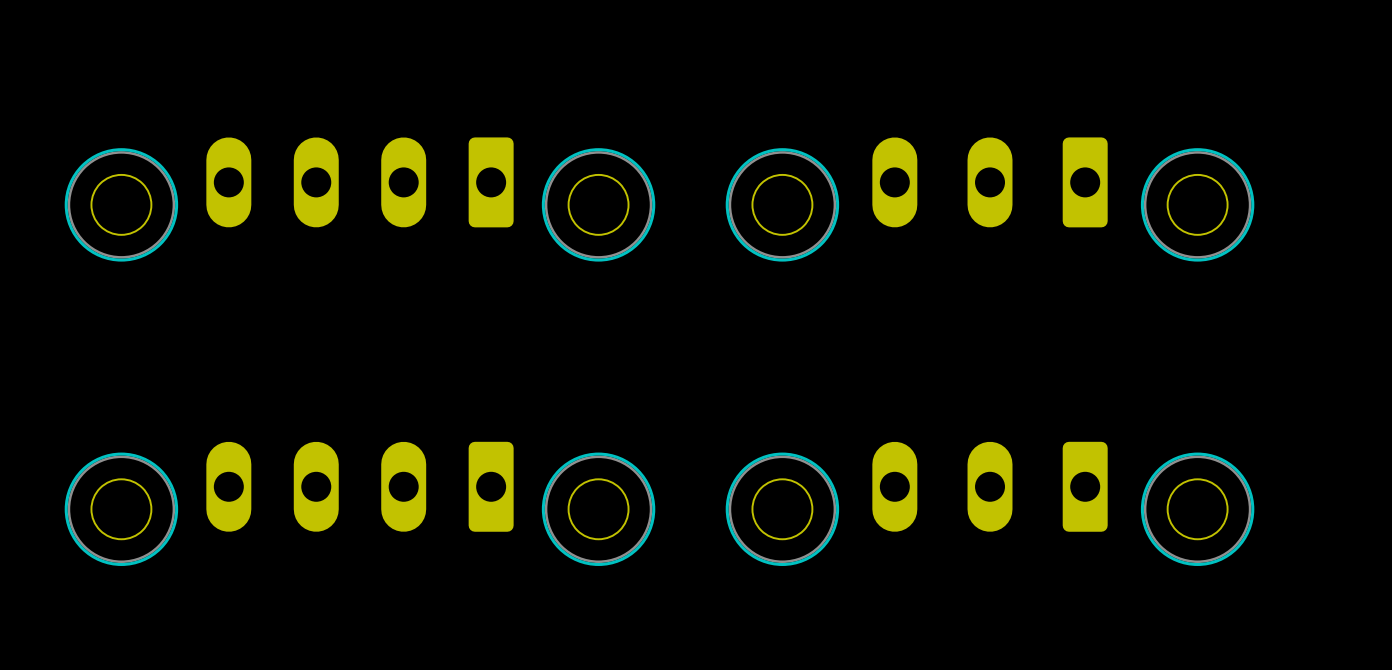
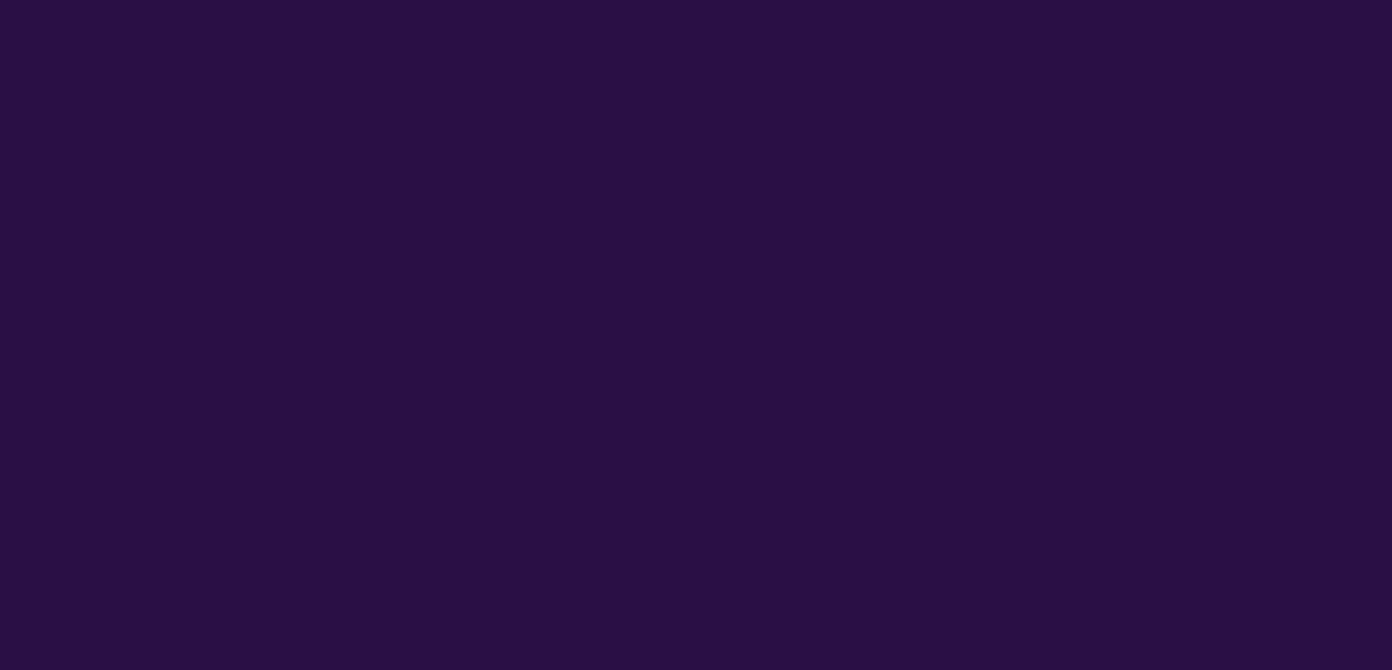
part: (359, 199) -> none
part: (990, 199) -> none
part: (359, 503) -> none
part: (990, 503) -> none

